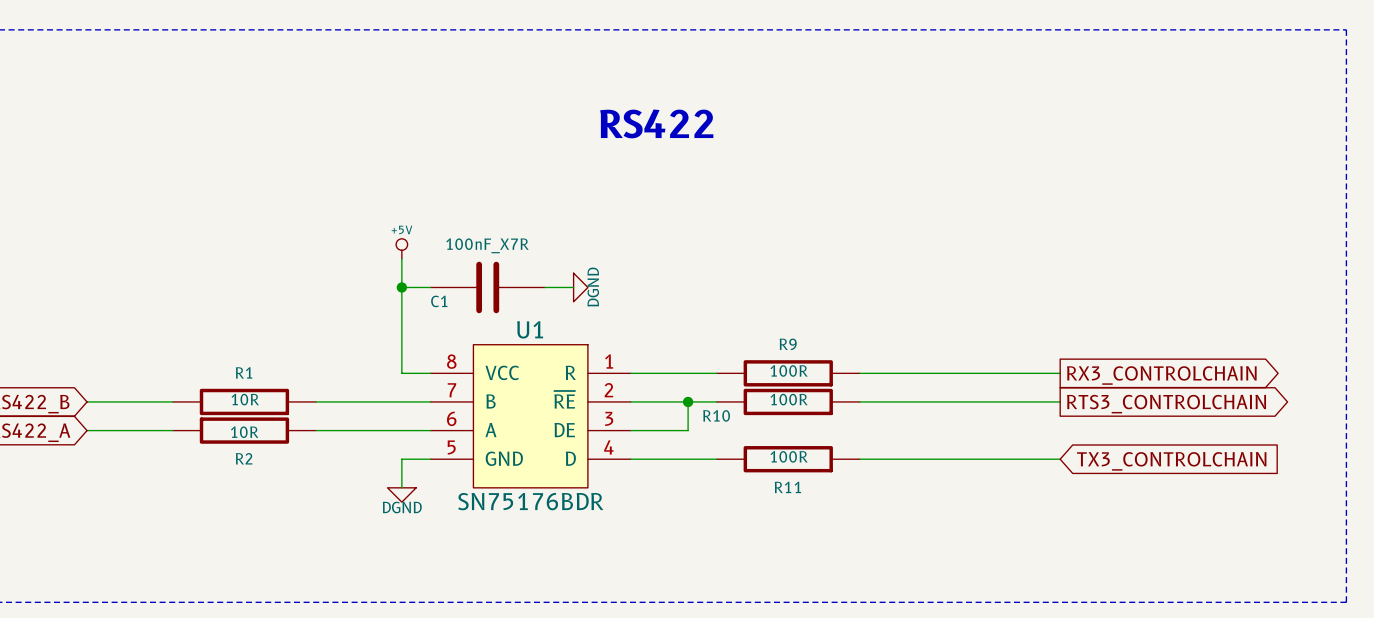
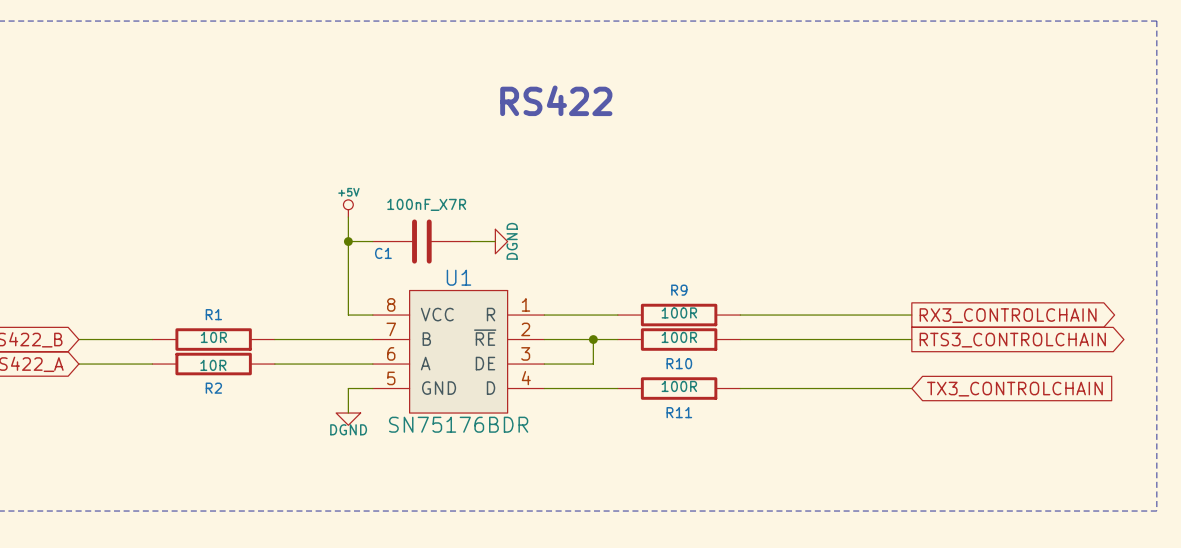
R10 name position: R10 (716, 415) -> R10 (679, 363)

